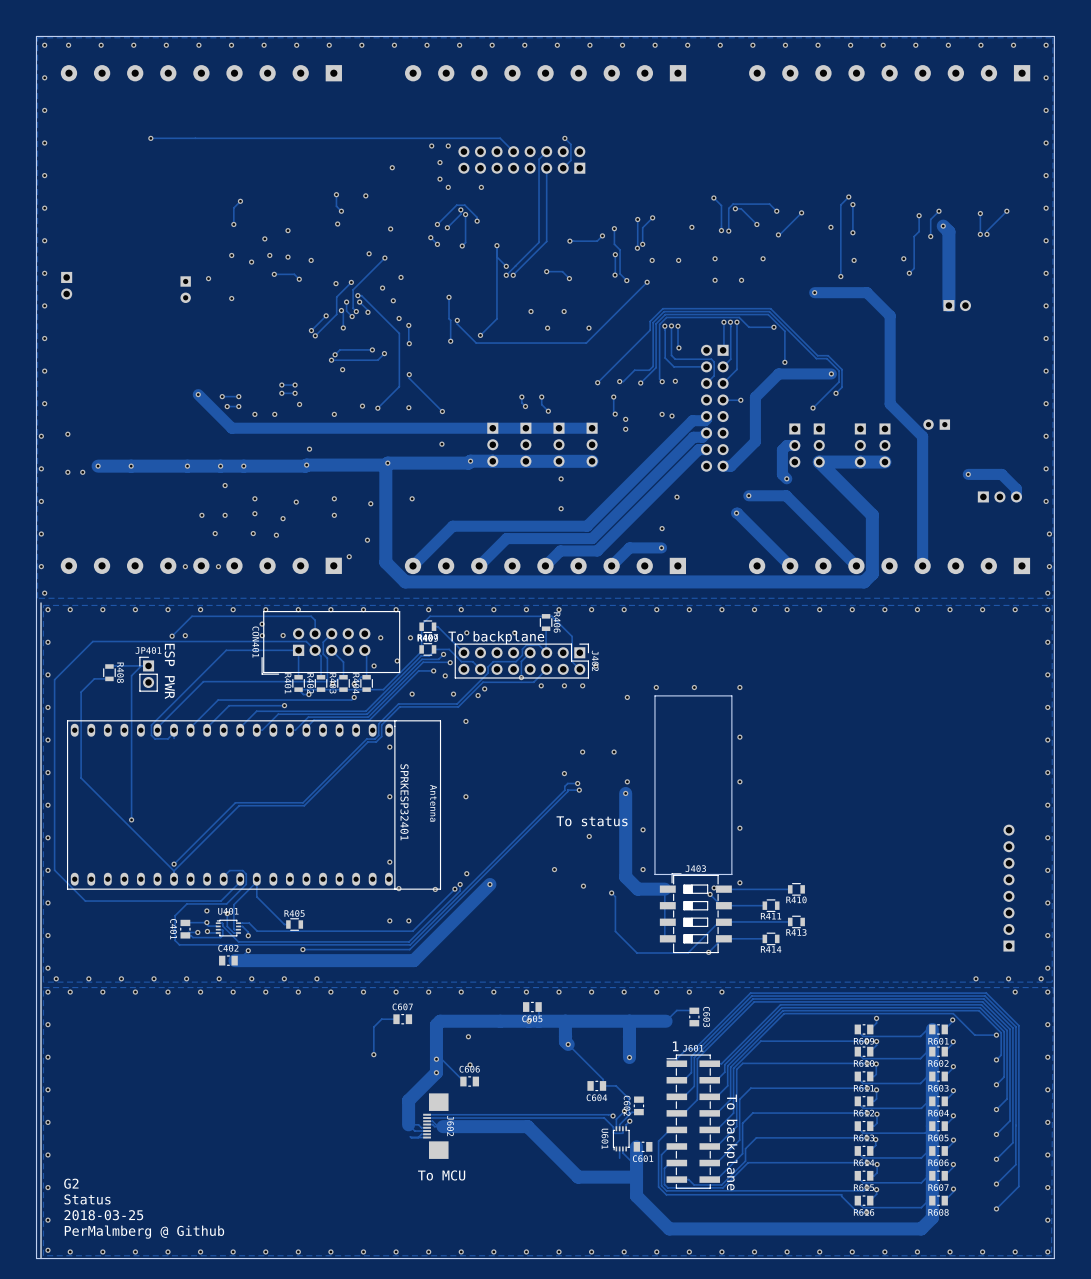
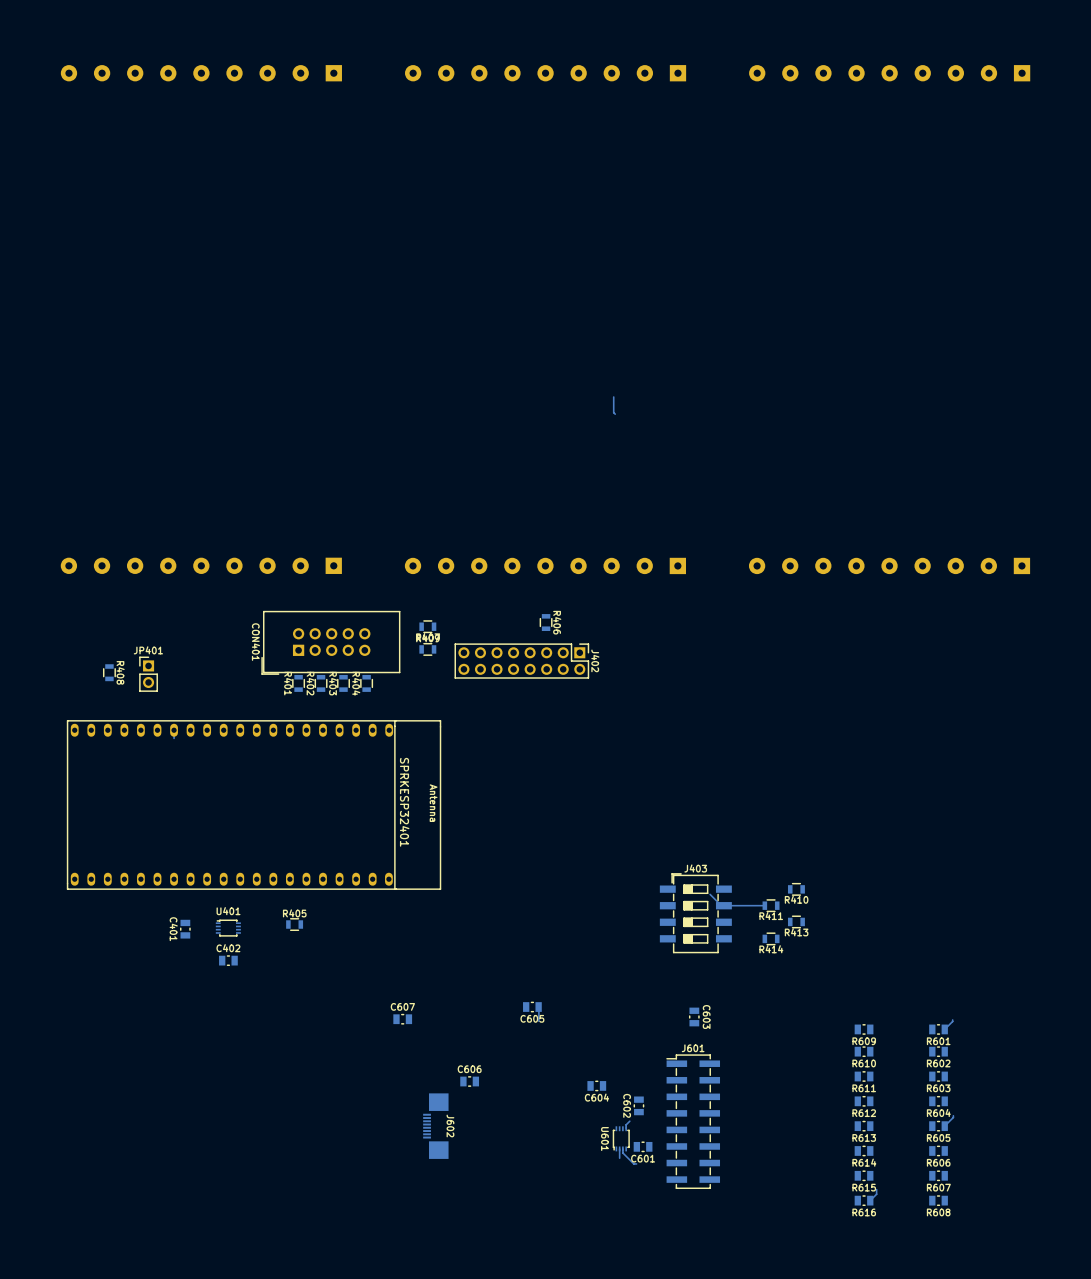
board edge: (1054, 36) (1054, 1258) (36, 1258) (36, 36) (1054, 36) -> none
zone outline: (1052, 37) (37, 37) (37, 598) (1052, 598) (1052, 37) -> none
via: (44, 45) -> none
via: (68, 45) -> none
via: (101, 45) -> none
via: (133, 45) -> none
via: (166, 45) -> none
via: (198, 45) -> none
via: (231, 45) -> none
via: (264, 45) -> none
via: (296, 45) -> none
via: (329, 45) -> none
via: (361, 45) -> none
via: (394, 45) -> none
via: (427, 45) -> none
via: (459, 45) -> none
via: (492, 45) -> none
via: (524, 45) -> none
via: (557, 45) -> none
via: (589, 45) -> none
via: (622, 45) -> none
via: (655, 45) -> none
via: (687, 45) -> none
via: (720, 45) -> none
via: (752, 45) -> none
via: (785, 45) -> none
via: (818, 45) -> none
via: (850, 45) -> none
via: (883, 45) -> none
via: (915, 45) -> none
via: (948, 45) -> none
via: (980, 45) -> none
via: (1013, 45) -> none
via: (1046, 45) -> none
via: (44, 77) -> none
via: (1046, 77) -> none
via: (44, 110) -> none
via: (1046, 110) -> none
track: (150, 138) (500, 138) (513, 151) -> none
via: (150, 138) -> none
track: (564, 138) (570, 144) (570, 160) (563, 168) -> none
via: (564, 138) -> none
via: (44, 143) -> none
via: (1046, 143) -> none
via: (431, 146) -> none
via: (448, 146) -> none
track: (546, 151) (539, 159) (539, 242) (515, 265) -> none
part: (521, 159) -> none
via: (439, 162) -> none
via: (392, 167) -> none
track: (546, 168) (546, 241) (513, 275) -> none
via: (44, 175) -> none
via: (1046, 175) -> none
via: (439, 179) -> none
via: (448, 187) -> none
via: (481, 187) -> none
track: (336, 194) (336, 206) (341, 211) -> none
via: (336, 194) -> none
via: (365, 195) -> none
track: (713, 197) (721, 205) (721, 230) -> none
via: (713, 197) -> none
track: (848, 197) (840, 204) (840, 276) -> none
via: (848, 197) -> none
track: (240, 201) (233, 207) (233, 224) -> none
via: (240, 201) -> none
track: (852, 204) (852, 232) -> none
via: (852, 204) -> none
via: (44, 208) -> none
track: (735, 208) (741, 208) (756, 224) -> none
via: (735, 208) -> none
via: (1046, 208) -> none
track: (460, 209) (460, 214) (447, 227) -> none
via: (460, 209) -> none
via: (341, 211) -> none
track: (776, 211) (769, 204) (733, 204) (728, 208) (728, 231) -> none
via: (776, 211) -> none
track: (938, 211) (930, 219) (930, 236) -> none
via: (938, 211) -> none
track: (1006, 211) (986, 231) (986, 234) -> none
via: (1006, 211) -> none
track: (801, 212) (778, 234) -> none
via: (801, 212) -> none
track: (980, 213) (980, 234) -> none
via: (980, 213) -> none
track: (465, 214) (465, 242) (462, 245) -> none
via: (465, 214) -> none
track: (919, 215) (919, 231) (914, 236) (914, 268) (909, 273) -> none
via: (919, 215) -> none
track: (652, 217) (642, 227) (642, 244) -> none
via: (652, 217) -> none
track: (637, 219) (637, 248) -> none
via: (637, 219) -> none
track: (477, 221) (477, 217) (464, 205) (456, 205) (437, 224) -> none
via: (477, 221) -> none
via: (233, 224) -> none
via: (337, 224) -> none
via: (437, 224) -> none
via: (756, 224) -> none
track: (943, 226) (948, 231) (948, 305) -> none
via: (943, 226) -> none
via: (447, 227) -> none
via: (691, 227) -> none
via: (830, 227) -> none
via: (390, 228) -> none
track: (614, 228) (614, 244) (620, 249) (620, 273) (626, 280) -> none
via: (614, 228) -> none
via: (288, 230) -> none
via: (721, 230) -> none
via: (728, 231) -> none
via: (852, 232) -> none
via: (778, 234) -> none
via: (980, 234) -> none
via: (986, 234) -> none
track: (602, 235) (597, 241) (569, 241) -> none
via: (602, 235) -> none
via: (930, 236) -> none
track: (430, 237) (437, 244) -> none
via: (430, 237) -> none
via: (264, 238) -> none
via: (44, 240) -> none
via: (1046, 240) -> none
via: (569, 241) -> none
via: (437, 244) -> none
via: (642, 244) -> none
via: (462, 245) -> none
track: (496, 245) (496, 318) (480, 335) -> none
via: (496, 245) -> none
via: (637, 248) -> none
via: (369, 253) -> none
track: (615, 254) (615, 275) -> none
via: (615, 254) -> none
via: (231, 255) -> none
via: (269, 255) -> none
via: (288, 257) -> none
track: (496, 257) (506, 266) -> none
track: (384, 258) (353, 289) (353, 308) (356, 311) -> none
via: (384, 258) -> none
via: (715, 258) -> none
via: (763, 258) -> none
via: (903, 258) -> none
via: (311, 260) -> none
via: (652, 260) -> none
via: (678, 260) -> none
via: (854, 260) -> none
via: (251, 262) -> none
track: (515, 265) (506, 275) -> none
via: (506, 266) -> none
track: (546, 271) (562, 271) (569, 278) -> none
via: (546, 271) -> none
via: (44, 273) -> none
via: (909, 273) -> none
via: (1046, 273) -> none
track: (274, 274) (294, 274) (299, 279) -> none
via: (274, 274) -> none
via: (506, 275) -> none
via: (513, 275) -> none
via: (615, 275) -> none
via: (840, 276) -> none
via: (401, 277) -> none
via: (208, 278) -> none
via: (569, 278) -> none
via: (299, 279) -> none
via: (626, 280) -> none
via: (715, 280) -> none
via: (741, 280) -> none
track: (351, 282) (336, 297) (336, 314) (315, 335) -> none
via: (351, 282) -> none
track: (647, 282) (586, 343) (476, 343) (457, 324) (457, 320) -> none
via: (647, 282) -> none
via: (336, 283) -> none
part: (66, 285) -> none
via: (382, 288) -> none
part: (185, 289) -> none
track: (814, 292) (866, 292) (890, 315) (890, 404) (922, 436) (922, 565) -> none
via: (814, 292) -> none
track: (357, 295) (361, 295) (399, 333) (399, 386) (377, 408) -> none
via: (357, 295) -> none
track: (449, 297) (450, 341) -> none
via: (449, 297) -> none
via: (231, 298) -> none
via: (393, 300) -> none
track: (346, 302) (346, 310) (352, 316) -> none
via: (346, 302) -> none
track: (359, 302) (367, 312) -> none
via: (359, 302) -> none
via: (44, 305) -> none
part: (957, 305) -> none
via: (1046, 305) -> none
track: (341, 310) (343, 312) (343, 327) -> none
via: (341, 310) -> none
via: (356, 311) -> none
via: (531, 311) -> none
via: (564, 311) -> none
via: (367, 312) -> none
track: (326, 315) (311, 330) -> none
via: (326, 315) -> none
via: (352, 316) -> none
via: (399, 318) -> none
via: (457, 320) -> none
track: (723, 322) (723, 349) -> none
via: (723, 322) -> none
track: (730, 322) (730, 359) (723, 366) -> none
via: (730, 322) -> none
track: (736, 322) (736, 369) (723, 383) -> none
via: (736, 322) -> none
track: (408, 325) (409, 343) -> none
via: (408, 325) -> none
track: (671, 325) (671, 355) (675, 359) (711, 359) (714, 361) (714, 375) (706, 383) -> none
via: (671, 325) -> none
track: (664, 326) (665, 358) (674, 366) (706, 366) -> none
via: (664, 326) -> none
track: (678, 326) (678, 347) -> none
via: (678, 326) -> none
via: (343, 327) -> none
track: (773, 327) (749, 327) (739, 317) (666, 317) (659, 324) (659, 379) (662, 381) -> none
via: (773, 327) -> none
via: (547, 328) -> none
via: (588, 328) -> none
via: (311, 330) -> none
via: (315, 335) -> none
via: (480, 335) -> none
via: (44, 338) -> none
via: (1046, 338) -> none
via: (450, 341) -> none
via: (409, 343) -> none
via: (678, 347) -> none
track: (372, 349) (339, 349) (335, 354) -> none
via: (372, 349) -> none
track: (384, 353) (377, 360) (331, 360) -> none
via: (384, 353) -> none
via: (335, 354) -> none
via: (331, 360) -> none
track: (784, 362) (784, 331) (768, 314) (665, 314) (656, 323) (656, 367) (640, 383) -> none
via: (784, 362) -> none
via: (342, 369) -> none
via: (44, 371) -> none
via: (1046, 371) -> none
track: (831, 373) (778, 373) (755, 397) (755, 441) (730, 466) (723, 466) -> none
via: (831, 373) -> none
track: (409, 374) (409, 378) (442, 411) -> none
via: (409, 374) -> none
track: (619, 381) (623, 381) (634, 370) (649, 370) (653, 366) (653, 322) (664, 311) (769, 311) (816, 358) (826, 358) (839, 370) (839, 382) (813, 408) -> none
via: (619, 381) -> none
via: (662, 381) -> none
via: (675, 381) -> none
track: (597, 382) (650, 330) (650, 321) (662, 308) (770, 308) (817, 355) (828, 355) (841, 369) (841, 387) (836, 393) -> none
via: (597, 382) -> none
via: (640, 383) -> none
via: (281, 385) -> none
track: (295, 385) (281, 385) -> none
via: (295, 385) -> none
via: (281, 393) -> none
track: (295, 393) (281, 393) -> none
via: (295, 393) -> none
via: (836, 393) -> none
track: (198, 394) (231, 428) (592, 428) -> none
via: (198, 394) -> none
via: (222, 396) -> none
track: (238, 396) (222, 396) -> none
via: (238, 396) -> none
track: (521, 397) (521, 402) (525, 406) -> none
via: (521, 397) -> none
track: (541, 397) (541, 404) (548, 411) -> none
via: (541, 397) -> none
via: (613, 397) -> none
track: (723, 399) (740, 400) -> none
via: (740, 400) -> none
via: (44, 403) -> none
via: (1046, 403) -> none
via: (299, 404) -> none
via: (227, 406) -> none
track: (238, 406) (227, 406) -> none
via: (238, 406) -> none
via: (362, 406) -> none
via: (525, 406) -> none
via: (408, 407) -> none
via: (377, 408) -> none
part: (714, 408) -> none
via: (813, 408) -> none
via: (442, 411) -> none
via: (548, 411) -> none
via: (254, 414) -> none
via: (274, 414) -> none
via: (334, 414) -> none
via: (615, 414) -> none
via: (662, 414) -> none
via: (672, 416) -> none
track: (706, 416) (705, 420) (692, 420) (587, 526) (452, 526) (413, 565) -> none
via: (625, 419) -> none
part: (936, 424) -> none
via: (625, 429) -> none
track: (706, 433) (702, 437) (693, 437) (592, 538) (506, 538) (479, 565) -> none
via: (67, 434) -> none
via: (41, 436) -> none
via: (1046, 436) -> none
via: (441, 444) -> none
part: (492, 444) -> none
part: (525, 444) -> none
part: (559, 444) -> none
part: (592, 444) -> none
track: (794, 445) (786, 445) (782, 450) (782, 474) (786, 478) -> none
part: (794, 445) -> none
part: (819, 445) -> none
part: (860, 445) -> none
part: (884, 445) -> none
via: (309, 449) -> none
track: (706, 449) (698, 449) (597, 550) (560, 550) (545, 565) -> none
via: (470, 461) -> none
track: (592, 461) (470, 461) (468, 463) (387, 463) (385, 465) -> none
track: (884, 462) (819, 462) (872, 515) (872, 573) (864, 581) (405, 581) (385, 562) (385, 465) -> none
via: (387, 463) -> none
via: (306, 465) -> none
track: (385, 465) (98, 466) -> none
via: (98, 466) -> none
via: (131, 466) -> none
via: (187, 466) -> none
via: (220, 466) -> none
via: (243, 466) -> none
via: (41, 468) -> none
via: (1046, 468) -> none
via: (67, 472) -> none
via: (82, 472) -> none
track: (968, 474) (1001, 474) (1016, 489) (1016, 496) -> none
via: (968, 474) -> none
via: (561, 478) -> none
via: (786, 478) -> none
via: (225, 485) -> none
track: (748, 495) (786, 495) (856, 565) -> none
via: (748, 495) -> none
part: (999, 496) -> none
via: (676, 497) -> none
via: (254, 498) -> none
via: (334, 498) -> none
via: (412, 498) -> none
via: (41, 501) -> none
via: (1046, 501) -> none
via: (296, 502) -> none
via: (370, 503) -> none
via: (561, 508) -> none
via: (254, 513) -> none
track: (736, 513) (790, 565) -> none
via: (736, 513) -> none
via: (201, 515) -> none
via: (225, 515) -> none
via: (334, 515) -> none
via: (283, 518) -> none
via: (662, 528) -> none
via: (215, 533) -> none
via: (253, 533) -> none
via: (41, 534) -> none
via: (1049, 534) -> none
via: (276, 535) -> none
via: (367, 540) -> none
track: (661, 547) (629, 547) (611, 565) -> none
via: (661, 547) -> none
via: (349, 556) -> none
via: (41, 566) -> none
via: (185, 566) -> none
via: (218, 566) -> none
via: (1049, 566) -> none
via: (44, 593) -> none
via: (1047, 593) -> none
line: (41, 602) (41, 1258) -> none
zone outline: (1052, 605) (43, 605) (43, 982) (1052, 982) (1052, 605) -> none
via: (47, 609) -> none
via: (70, 609) -> none
via: (102, 609) -> none
via: (135, 609) -> none
via: (168, 609) -> none
via: (200, 609) -> none
via: (233, 609) -> none
via: (265, 609) -> none
via: (298, 609) -> none
via: (330, 609) -> none
via: (363, 609) -> none
via: (396, 609) -> none
via: (428, 609) -> none
via: (461, 609) -> none
via: (493, 609) -> none
via: (526, 609) -> none
via: (559, 609) -> none
via: (591, 609) -> none
via: (624, 609) -> none
via: (656, 609) -> none
via: (689, 609) -> none
via: (721, 609) -> none
via: (754, 609) -> none
via: (787, 609) -> none
via: (819, 609) -> none
via: (852, 609) -> none
via: (884, 609) -> none
via: (917, 609) -> none
via: (950, 609) -> none
via: (982, 609) -> none
via: (1015, 609) -> none
via: (1047, 609) -> none
via: (262, 624) -> none
track: (434, 626) (437, 626) (463, 652) -> none
track: (546, 628) (546, 652) -> none
via: (466, 632) -> none
via: (514, 632) -> none
track: (315, 633) (315, 620) (311, 616) (191, 616) (172, 636) -> none
track: (331, 633) (323, 642) (323, 654) (327, 658) (326, 681) (203, 681) (157, 727) (157, 730) -> none
via: (185, 635) -> none
via: (262, 635) -> none
via: (283, 635) -> none
via: (172, 636) -> none
via: (380, 637) -> none
via: (410, 637) -> none
text: To backplane (496, 637) -> none
via: (47, 642) -> none
via: (1047, 642) -> none
track: (331, 650) (343, 662) (343, 677) (339, 677) (332, 684) -> none
track: (364, 650) (366, 652) (366, 677) (361, 677) (354, 684) -> none
track: (530, 652) (521, 661) (521, 677) -> none
track: (546, 652) (539, 645) (526, 645) (522, 649) (522, 655) (516, 661) (493, 661) (488, 666) (488, 673) (457, 703) (398, 703) (378, 723) (378, 735) (375, 739) (366, 739) (303, 802) (235, 802) (174, 864) -> none
track: (443, 654) (438, 659) (421, 659) (367, 714) (278, 714) (262, 730) (256, 730) -> none
via: (443, 654) -> none
via: (397, 661) -> none
track: (450, 662) (423, 662) (368, 717) (308, 717) (295, 730) (289, 730) -> none
via: (450, 662) -> none
track: (141, 665) (131, 675) (131, 819) -> none
track: (148, 665) (109, 666) -> none
via: (374, 665) -> none
via: (595, 665) -> none
track: (480, 669) (472, 661) (461, 661) (449, 649) (434, 649) (429, 656) (421, 656) (365, 711) (256, 711) (240, 727) (240, 730) -> none
track: (546, 669) (533, 682) (482, 682) (458, 706) (399, 706) (381, 725) (381, 736) (376, 741) (368, 741) (304, 805) (239, 805) (174, 870) (174, 879) -> none
track: (579, 669) (572, 661) (572, 636) (551, 616) (430, 616) (421, 624) (421, 651) (383, 689) (298, 689) (303, 694) (308, 694) -> none
track: (433, 670) (418, 670) (369, 720) (314, 720) (306, 727) (306, 730) -> none
via: (433, 670) -> none
text: ESP PWR (169, 671) -> none
via: (47, 674) -> none
via: (1047, 674) -> none
via: (445, 675) -> none
track: (298, 677) (298, 650) (226, 650) (151, 725) (151, 735) (154, 738) (168, 738) (174, 730) -> none
track: (321, 677) (321, 656) (306, 641) (92, 641) (54, 679) (54, 870) (85, 901) (221, 901) (240, 881) (240, 879) -> none
via: (521, 677) -> none
track: (109, 678) (94, 678) (81, 692) (81, 778) (174, 871) -> none
via: (332, 684) -> none
via: (354, 684) -> none
via: (541, 685) -> none
via: (564, 685) -> none
via: (582, 685) -> none
via: (656, 687) -> none
via: (694, 687) -> none
via: (739, 687) -> none
via: (484, 688) -> none
via: (308, 694) -> none
via: (412, 694) -> none
via: (453, 694) -> none
via: (478, 695) -> none
board edge: (731, 695) (731, 874) (654, 874) (654, 695) (731, 695) -> none
track: (354, 697) (351, 700) (218, 700) (190, 727) (190, 730) -> none
via: (354, 697) -> none
via: (627, 697) -> none
track: (284, 705) (229, 705) (207, 727) (207, 730) -> none
via: (284, 705) -> none
via: (47, 707) -> none
via: (1047, 707) -> none
via: (465, 721) -> none
via: (739, 737) -> none
via: (47, 740) -> none
via: (1047, 740) -> none
via: (389, 747) -> none
via: (582, 752) -> none
via: (614, 752) -> none
via: (47, 772) -> none
via: (1047, 772) -> none
via: (564, 773) -> none
via: (627, 781) -> none
via: (739, 781) -> none
track: (577, 783) (567, 783) (564, 786) (564, 790) (410, 944) (179, 944) (175, 940) (175, 915) (186, 903) (226, 903) (246, 884) (246, 874) (242, 870) (229, 870) (223, 879) -> none
via: (577, 783) -> none
track: (579, 790) (567, 790) (409, 949) (302, 949) -> none
via: (579, 790) -> none
track: (625, 793) (625, 877) (637, 889) (664, 889) (664, 938) -> none
via: (625, 793) -> none
via: (389, 796) -> none
via: (465, 796) -> none
via: (47, 805) -> none
via: (1047, 805) -> none
via: (131, 819) -> none
text: To status (592, 821) -> none
via: (739, 828) -> none
via: (643, 829) -> none
via: (589, 836) -> none
via: (47, 837) -> none
via: (1047, 837) -> none
via: (389, 862) -> none
via: (174, 864) -> none
via: (554, 869) -> none
via: (643, 869) -> none
via: (47, 870) -> none
via: (1047, 870) -> none
via: (466, 873) -> none
track: (256, 879) (256, 896) (284, 924) (288, 924) -> none
track: (256, 881) (233, 904) (233, 928) (238, 929) -> none
via: (739, 882) -> none
track: (460, 884) (460, 890) (409, 941) (238, 941) (222, 926) (222, 923) (218, 923) -> none
via: (460, 884) -> none
track: (489, 884) (413, 960) (234, 960) (238, 960) (248, 950) -> none
via: (489, 884) -> none
via: (583, 886) -> none
track: (714, 887) (790, 889) -> none
via: (714, 887) -> none
via: (398, 888) -> none
part: (1008, 888) -> none
via: (435, 889) -> none
track: (454, 889) (412, 931) (257, 931) (249, 923) (238, 923) -> none
via: (454, 889) -> none
track: (611, 892) (615, 896) (615, 931) (636, 953) (688, 953) (718, 922) (726, 922) -> none
via: (611, 892) -> none
via: (710, 894) -> none
via: (47, 902) -> none
via: (1047, 902) -> none
via: (206, 910) -> none
track: (227, 913) (227, 926) (233, 932) (240, 932) -> none
via: (227, 913) -> none
via: (389, 920) -> none
via: (408, 920) -> none
track: (790, 921) (727, 921) (724, 924) -> none
track: (185, 922) (205, 922) (208, 926) (218, 926) -> none
via: (206, 922) -> none
track: (238, 926) (242, 926) (248, 932) (248, 935) -> none
track: (218, 929) (222, 930) (220, 937) (185, 935) (188, 932) (197, 932) -> none
track: (207, 931) (218, 932) -> none
via: (207, 931) -> none
via: (197, 932) -> none
via: (47, 935) -> none
via: (248, 935) -> none
via: (1047, 935) -> none
track: (764, 938) (722, 938) (708, 952) -> none
via: (302, 949) -> none
via: (248, 950) -> none
via: (708, 952) -> none
via: (47, 968) -> none
via: (1047, 968) -> none
via: (56, 978) -> none
via: (88, 978) -> none
via: (121, 978) -> none
via: (154, 978) -> none
via: (186, 978) -> none
via: (219, 978) -> none
via: (251, 978) -> none
via: (284, 978) -> none
via: (316, 978) -> none
via: (975, 978) -> none
via: (1008, 978) -> none
via: (1041, 978) -> none
zone outline: (1053, 987) (43, 987) (43, 1255) (1051, 1255) (1053, 987) -> none
via: (47, 992) -> none
via: (70, 992) -> none
via: (102, 992) -> none
via: (135, 992) -> none
via: (168, 992) -> none
via: (200, 992) -> none
via: (233, 992) -> none
via: (265, 992) -> none
via: (298, 992) -> none
via: (330, 992) -> none
via: (363, 992) -> none
via: (396, 992) -> none
via: (428, 992) -> none
via: (461, 992) -> none
via: (493, 992) -> none
via: (526, 992) -> none
via: (559, 992) -> none
via: (591, 992) -> none
via: (624, 992) -> none
via: (656, 992) -> none
via: (689, 992) -> none
via: (721, 992) -> none
via: (1015, 992) -> none
via: (1047, 992) -> none
track: (694, 1010) (676, 1010) (666, 1021) (440, 1021) (436, 1024) (436, 1072) (408, 1100) (408, 1124) -> none
track: (782, 1010) (979, 1010) (1001, 1032) (1001, 1055) (996, 1059) -> none
track: (782, 1010) (727, 1066) (727, 1085) (716, 1096) (709, 1096) -> none
track: (876, 1018) (876, 1023) (870, 1029) -> none
via: (876, 1018) -> none
track: (396, 1019) (381, 1019) (373, 1027) (373, 1054) -> none
via: (952, 1019) -> none
via: (528, 1021) -> none
track: (565, 1021) (565, 1041) (603, 1079) (603, 1085) (616, 1085) (629, 1099) (629, 1115) -> none
track: (629, 1021) (629, 1057) -> none
via: (47, 1024) -> none
via: (1047, 1024) -> none
track: (932, 1029) (932, 1217) (921, 1228) (669, 1228) (636, 1196) (636, 1146) -> none
track: (932, 1029) (927, 1029) (920, 1036) (863, 1036) (857, 1029) -> none
track: (996, 1035) (974, 1035) (953, 1013) (784, 1013) (730, 1067) (730, 1099) (716, 1113) (709, 1113) -> none
via: (996, 1035) -> none
via: (468, 1036) -> none
track: (866, 1041) (760, 1041) (733, 1068) (733, 1113) (716, 1129) (709, 1129) -> none
via: (866, 1041) -> none
track: (876, 1041) (876, 1045) (870, 1051) -> none
via: (876, 1041) -> none
track: (953, 1041) (944, 1051) -> none
via: (953, 1041) -> none
via: (568, 1044) -> none
text: 1 (675, 1046) -> none
track: (932, 1051) (927, 1051) (920, 1058) (863, 1058) (857, 1051) -> none
via: (373, 1054) -> none
via: (47, 1057) -> none
via: (629, 1057) -> none
via: (1047, 1057) -> none
track: (436, 1059) (441, 1059) (463, 1081) -> none
via: (436, 1059) -> none
via: (996, 1059) -> none
track: (676, 1063) (676, 1058) (686, 1048) (694, 1048) (750, 993) (986, 993) (1018, 1025) (1018, 1186) (996, 1208) -> none
track: (709, 1063) (721, 1063) (780, 1004) (981, 1004) (1007, 1030) (1007, 1099) (996, 1109) -> none
track: (867, 1063) (742, 1063) (736, 1069) (736, 1126) (716, 1146) (709, 1146) -> none
via: (867, 1063) -> none
track: (876, 1063) (876, 1074) (870, 1076) -> none
via: (876, 1063) -> none
via: (470, 1064) -> none
track: (953, 1066) (944, 1076) -> none
via: (953, 1066) -> none
via: (436, 1072) -> none
track: (932, 1076) (927, 1076) (920, 1083) (863, 1083) (857, 1076) -> none
track: (676, 1080) (683, 1080) (691, 1072) (691, 1056) (751, 996) (985, 996) (1015, 1026) (1015, 1164) (996, 1184) -> none
track: (709, 1080) (716, 1080) (724, 1072) (724, 1064) (781, 1007) (980, 1007) (1004, 1031) (1004, 1077) (996, 1084) -> none
via: (996, 1084) -> none
track: (867, 1088) (750, 1088) (739, 1099) (739, 1140) (716, 1163) (709, 1163) -> none
via: (867, 1088) -> none
via: (47, 1089) -> none
track: (876, 1089) (876, 1098) (870, 1101) -> none
via: (876, 1089) -> none
via: (1047, 1089) -> none
track: (953, 1090) (944, 1101) -> none
via: (953, 1090) -> none
track: (676, 1096) (683, 1096) (694, 1086) (694, 1057) (753, 998) (983, 998) (1012, 1027) (1012, 1142) (996, 1159) -> none
track: (932, 1101) (928, 1101) (921, 1108) (863, 1108) (857, 1103) -> none
via: (996, 1109) -> none
track: (624, 1111) (616, 1119) (616, 1128) -> none
via: (624, 1111) -> none
track: (638, 1112) (631, 1112) (619, 1124) (619, 1128) -> none
track: (676, 1113) (683, 1113) (697, 1099) (697, 1058) (754, 1001) (982, 1001) (1009, 1029) (1009, 1120) (996, 1134) -> none
track: (867, 1113) (752, 1113) (742, 1123) (742, 1153) (716, 1179) (709, 1179) -> none
via: (867, 1113) -> none
track: (427, 1114) (613, 1115) -> none
track: (877, 1114) (877, 1123) (874, 1126) (870, 1126) -> none
via: (877, 1114) -> none
via: (613, 1115) -> none
via: (953, 1115) -> none
track: (427, 1118) (604, 1118) (613, 1127) (613, 1133) (622, 1133) (622, 1128) -> none
track: (427, 1121) (432, 1121) (437, 1126) -> none
via: (629, 1121) -> none
via: (47, 1122) -> none
via: (1047, 1122) -> none
track: (408, 1124) (418, 1124) (421, 1127) (427, 1127) -> none
track: (408, 1124) (414, 1131) (427, 1131) -> none
track: (427, 1124) (434, 1126) (527, 1126) (578, 1177) (636, 1177) -> none
track: (932, 1126) (925, 1133) (863, 1133) (857, 1126) -> none
track: (676, 1129) (669, 1129) (658, 1141) (658, 1186) (666, 1194) (841, 1194) (857, 1212) (866, 1212) -> none
track: (427, 1134) (421, 1134) (418, 1137) -> none
via: (996, 1134) -> none
track: (410, 1136) (427, 1137) -> none
track: (866, 1137) (756, 1137) (745, 1148) (745, 1161) (721, 1184) (694, 1184) (688, 1179) (676, 1179) -> none
via: (866, 1137) -> none
track: (875, 1139) (875, 1145) (870, 1150) -> none
via: (875, 1139) -> none
track: (953, 1140) (944, 1150) -> none
via: (953, 1140) -> none
text: To backplane (730, 1142) -> none
track: (676, 1146) (669, 1146) (661, 1154) (661, 1185) (666, 1190) (863, 1190) (867, 1187) -> none
track: (932, 1150) (928, 1150) (921, 1157) (863, 1157) (857, 1152) -> none
via: (47, 1154) -> none
via: (1047, 1154) -> none
via: (996, 1159) -> none
track: (867, 1162) (748, 1162) (722, 1187) (667, 1187) (664, 1184) (664, 1168) (669, 1163) (676, 1163) -> none
via: (867, 1162) -> none
track: (877, 1164) (877, 1172) (874, 1175) (870, 1175) -> none
via: (877, 1164) -> none
track: (953, 1164) (953, 1167) (944, 1175) -> none
via: (953, 1164) -> none
text: To MCU (441, 1175) -> none
track: (932, 1175) (928, 1175) (921, 1182) (863, 1182) (857, 1177) -> none
text: G2 (71, 1183) -> none
via: (996, 1184) -> none
via: (47, 1187) -> none
via: (867, 1187) -> none
via: (1047, 1187) -> none
via: (876, 1189) -> none
track: (953, 1189) (953, 1191) (944, 1200) -> none
via: (953, 1189) -> none
text: Status (87, 1199) -> none
track: (932, 1200) (928, 1200) (921, 1207) (863, 1207) (857, 1202) -> none
via: (996, 1208) -> none
via: (866, 1212) -> none
text: 2018-03-25 (103, 1215) -> none
via: (47, 1220) -> none
via: (1047, 1220) -> none
text: PerMalmberg @ Github (144, 1232) -> none
via: (47, 1250) -> none
via: (70, 1251) -> none
via: (102, 1251) -> none
via: (135, 1251) -> none
via: (168, 1251) -> none
via: (200, 1251) -> none
via: (233, 1251) -> none
via: (265, 1251) -> none
via: (298, 1251) -> none
via: (330, 1251) -> none
via: (363, 1251) -> none
via: (396, 1251) -> none
via: (428, 1251) -> none
via: (461, 1251) -> none
via: (493, 1251) -> none
via: (526, 1251) -> none
via: (559, 1251) -> none
via: (591, 1251) -> none
via: (624, 1251) -> none
via: (656, 1251) -> none
via: (689, 1251) -> none
via: (721, 1251) -> none
via: (754, 1251) -> none
via: (787, 1251) -> none
via: (819, 1251) -> none
via: (852, 1251) -> none
via: (884, 1251) -> none
via: (917, 1251) -> none
via: (950, 1251) -> none
via: (982, 1251) -> none
via: (1015, 1251) -> none
via: (1047, 1251) -> none

